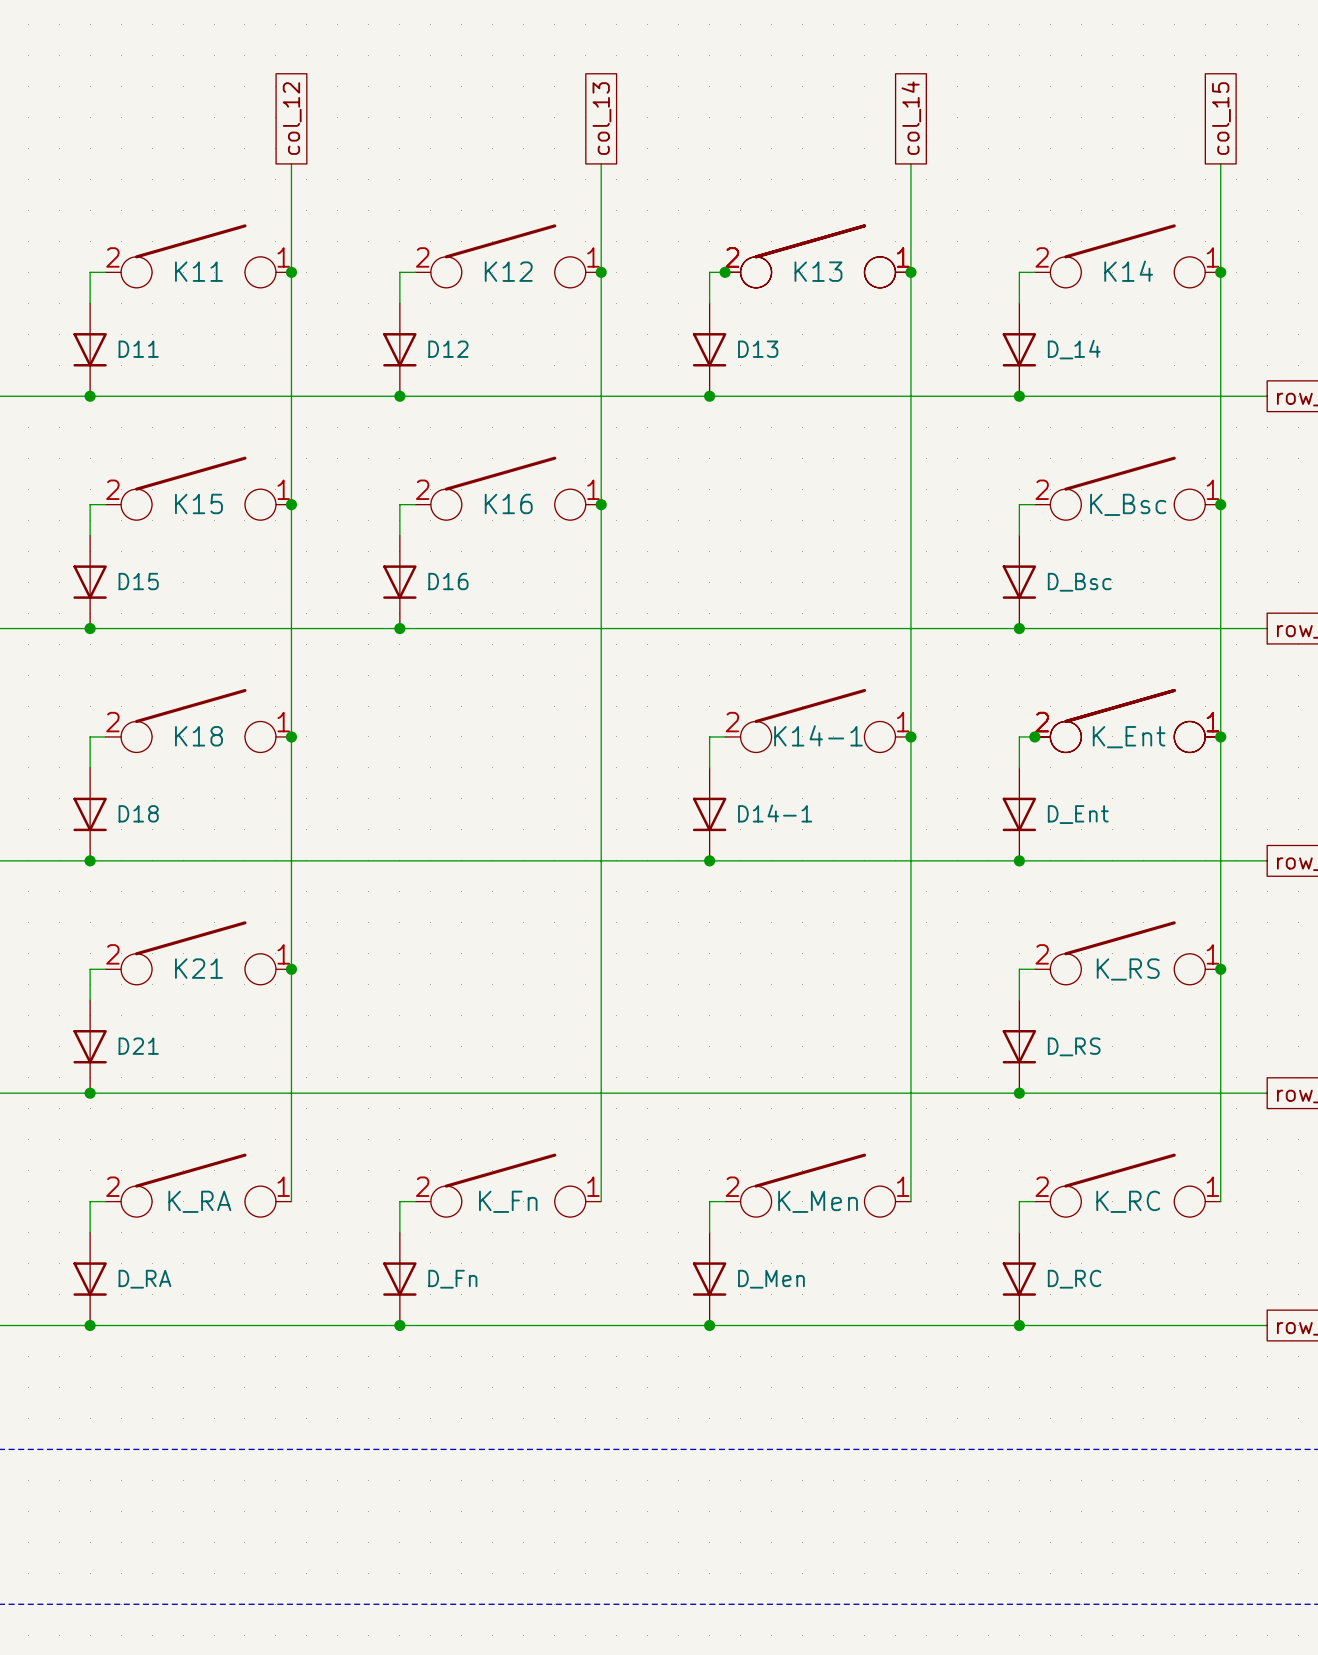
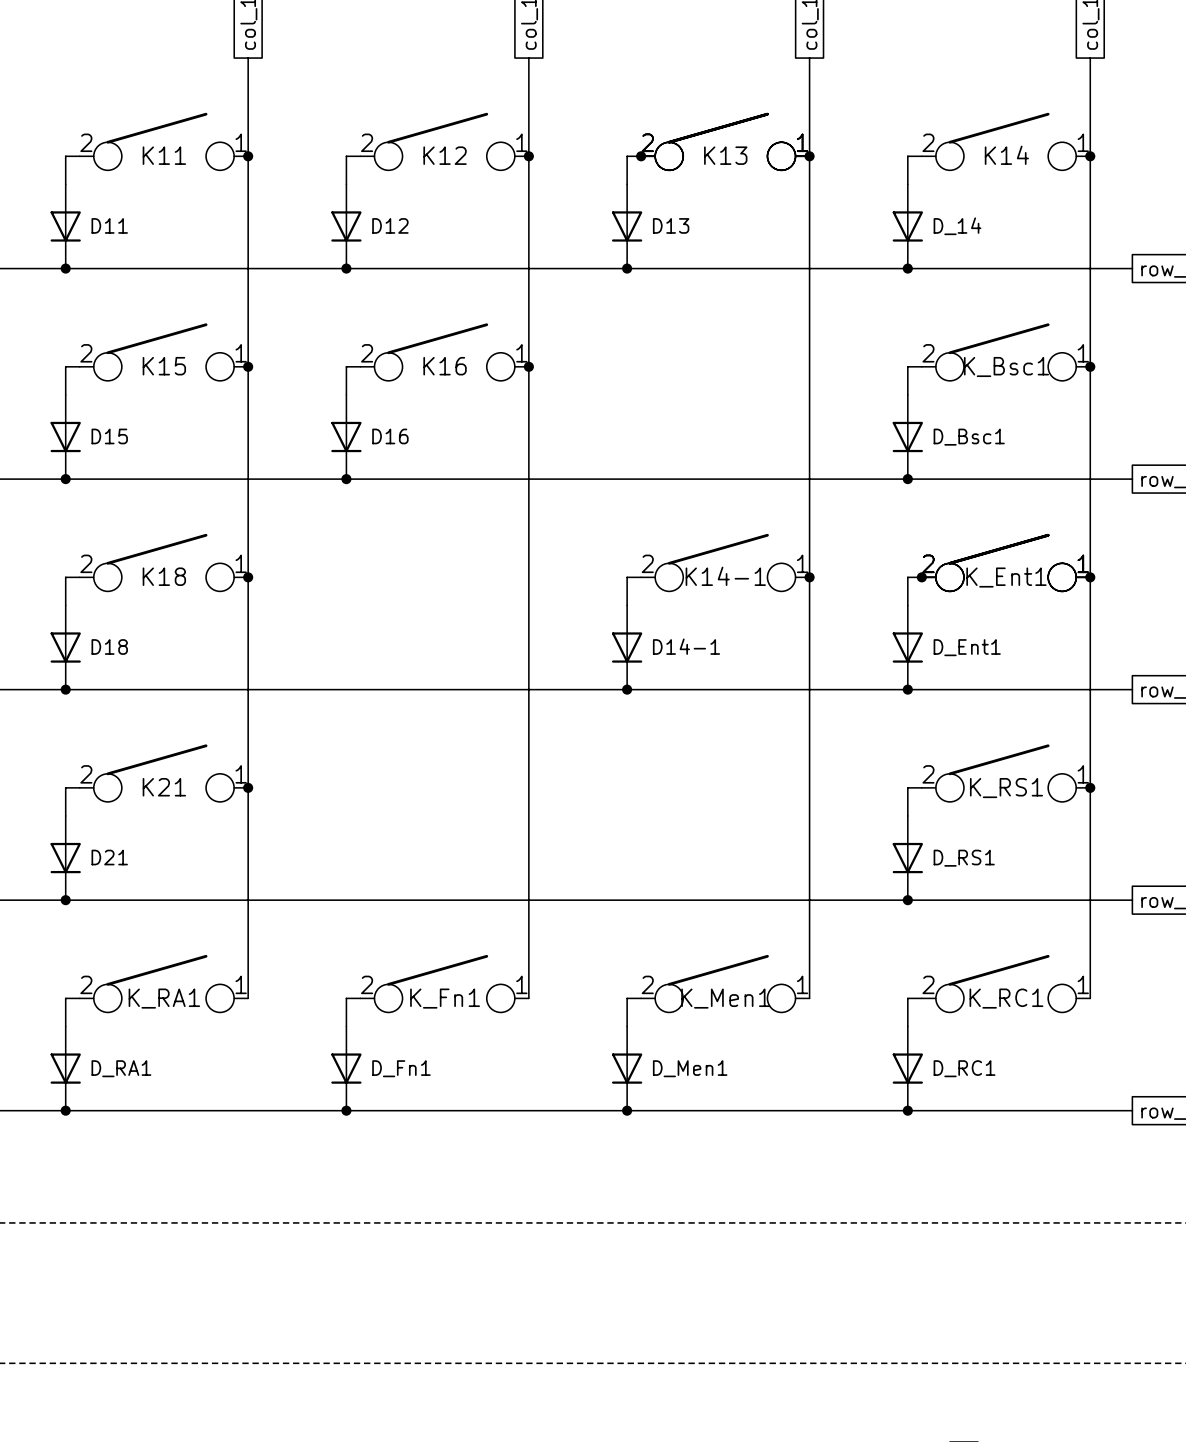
K_Bsc name: K_Bsc (1128, 504) -> K_Bsc1 (1006, 366)
D_Bsc name: D_Bsc (1079, 582) -> D_Bsc1 (969, 437)
K_Ent name: K_Ent (1129, 737) -> K_Ent1 (1006, 577)
D_Ent name: D_Ent (1078, 814) -> D_Ent1 (967, 647)
K_RS name: K_RS (1128, 969) -> K_RS1 (1006, 788)
D_RS name: D_RS (1074, 1046) -> D_RS1 (964, 858)
K_RA name: K_RA (199, 1201) -> K_RA1 (164, 998)
K_Fn name: K_Fn (508, 1201) -> K_Fn1 (445, 998)
K_Men name: K_Men (818, 1201) -> K_Men1 (725, 998)
K_RC name: K_RC (1128, 1201) -> K_RC1 (1006, 998)
D_RA name: D_RA (144, 1279) -> D_RA1 (121, 1068)
D_Fn name: D_Fn (452, 1279) -> D_Fn1 (401, 1068)
D_Men name: D_Men (771, 1279) -> D_Men1 (690, 1068)
D_RC name: D_RC (1074, 1279) -> D_RC1 (964, 1068)

